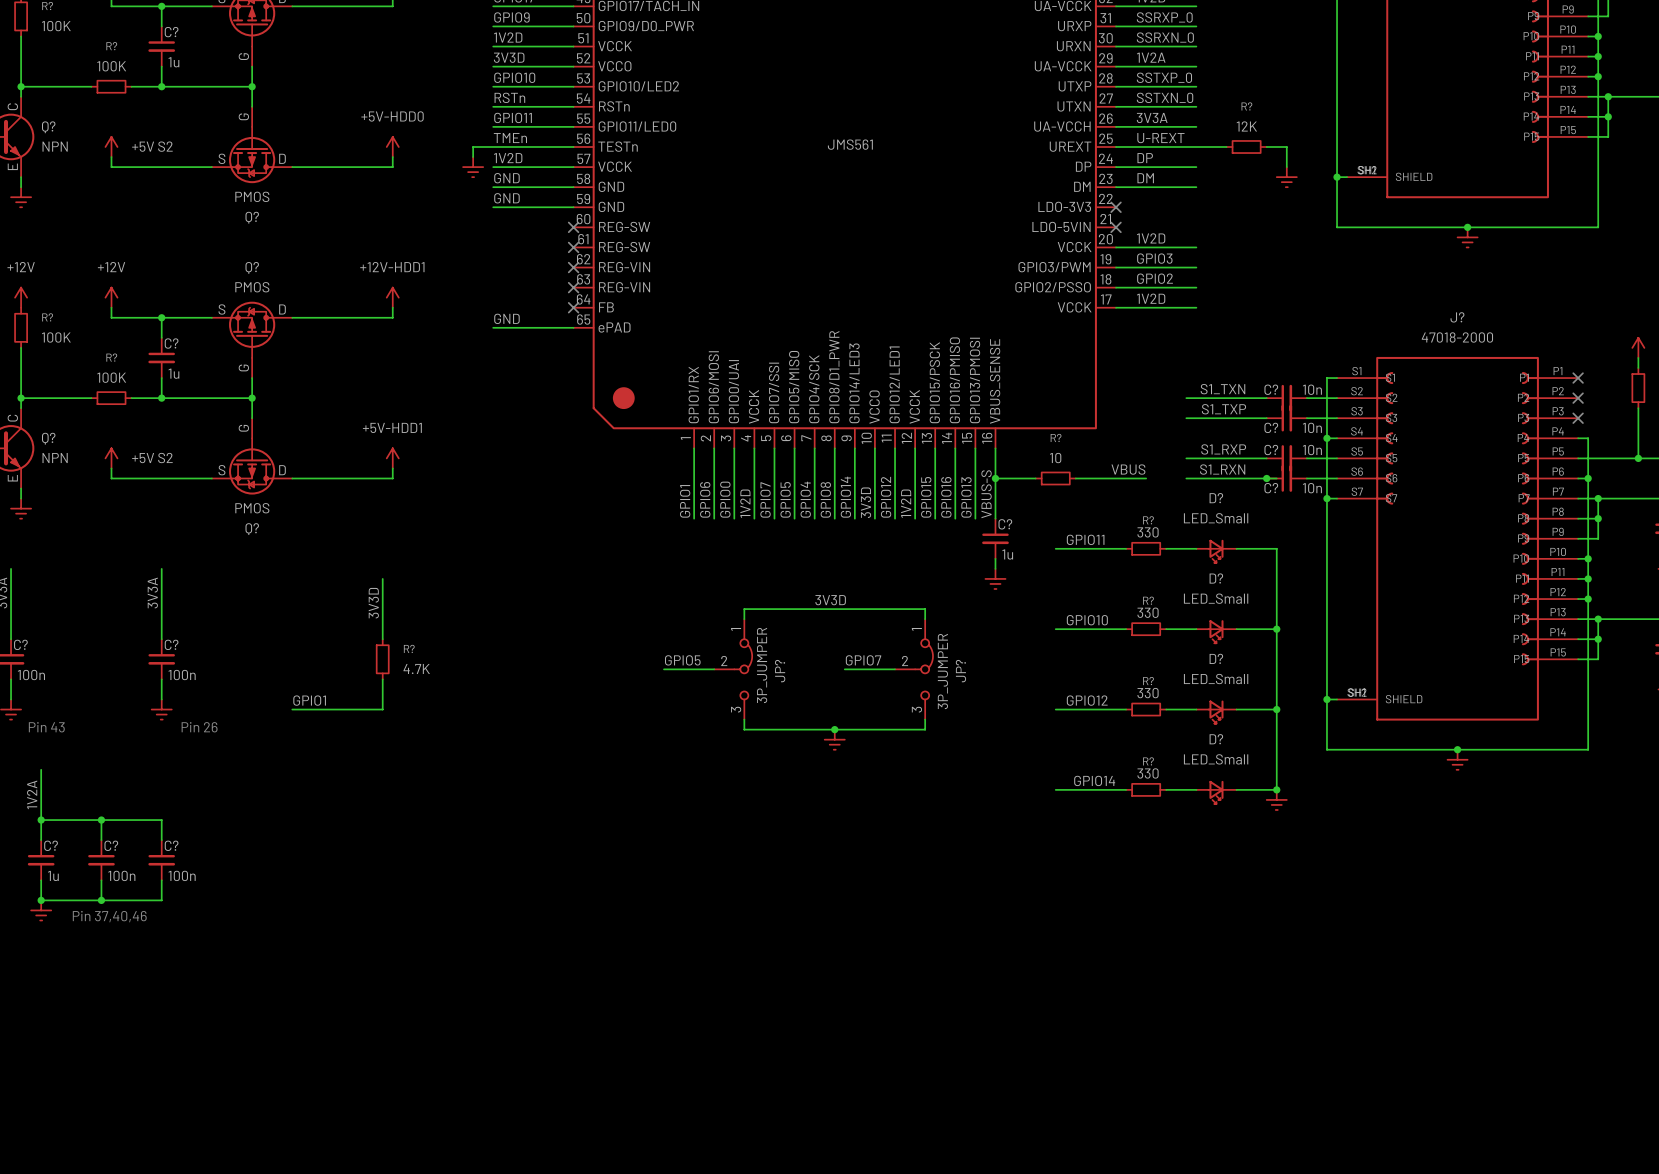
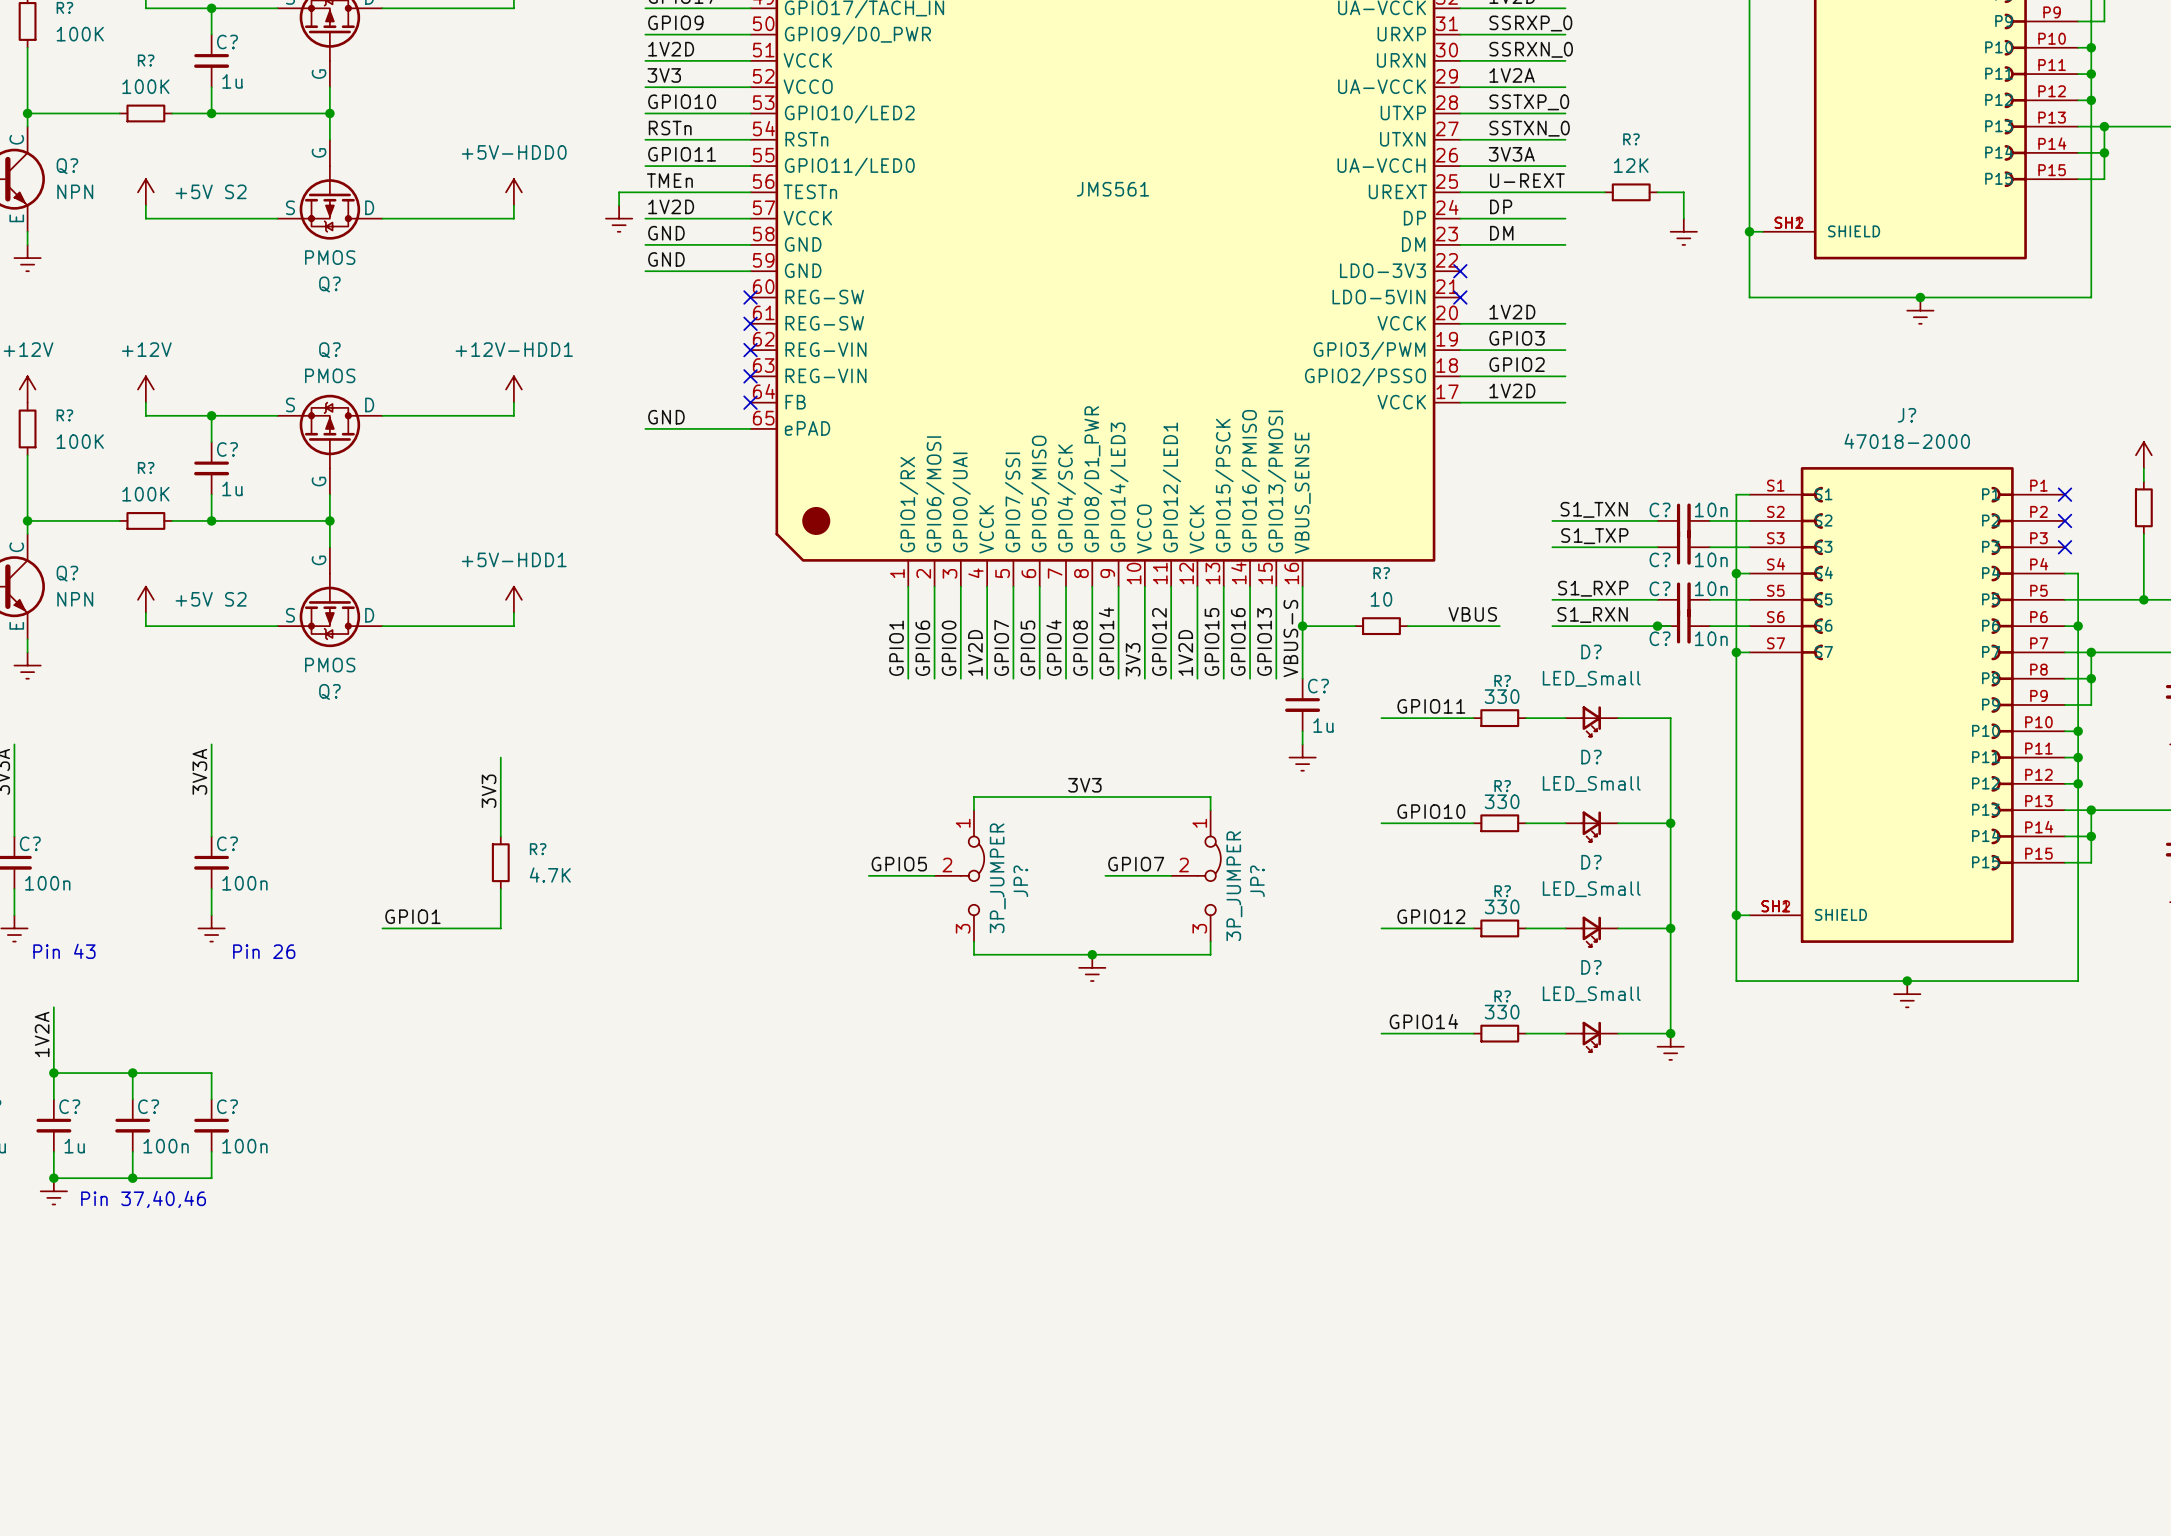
label: 3V3D (509, 57) -> 3V3 (664, 75)
label: 3V3D (866, 502) -> 3V3 (1133, 659)
label: 3V3D (830, 600) -> 3V3 (1084, 785)
label: 3V3D (373, 603) -> 3V3 (489, 791)

